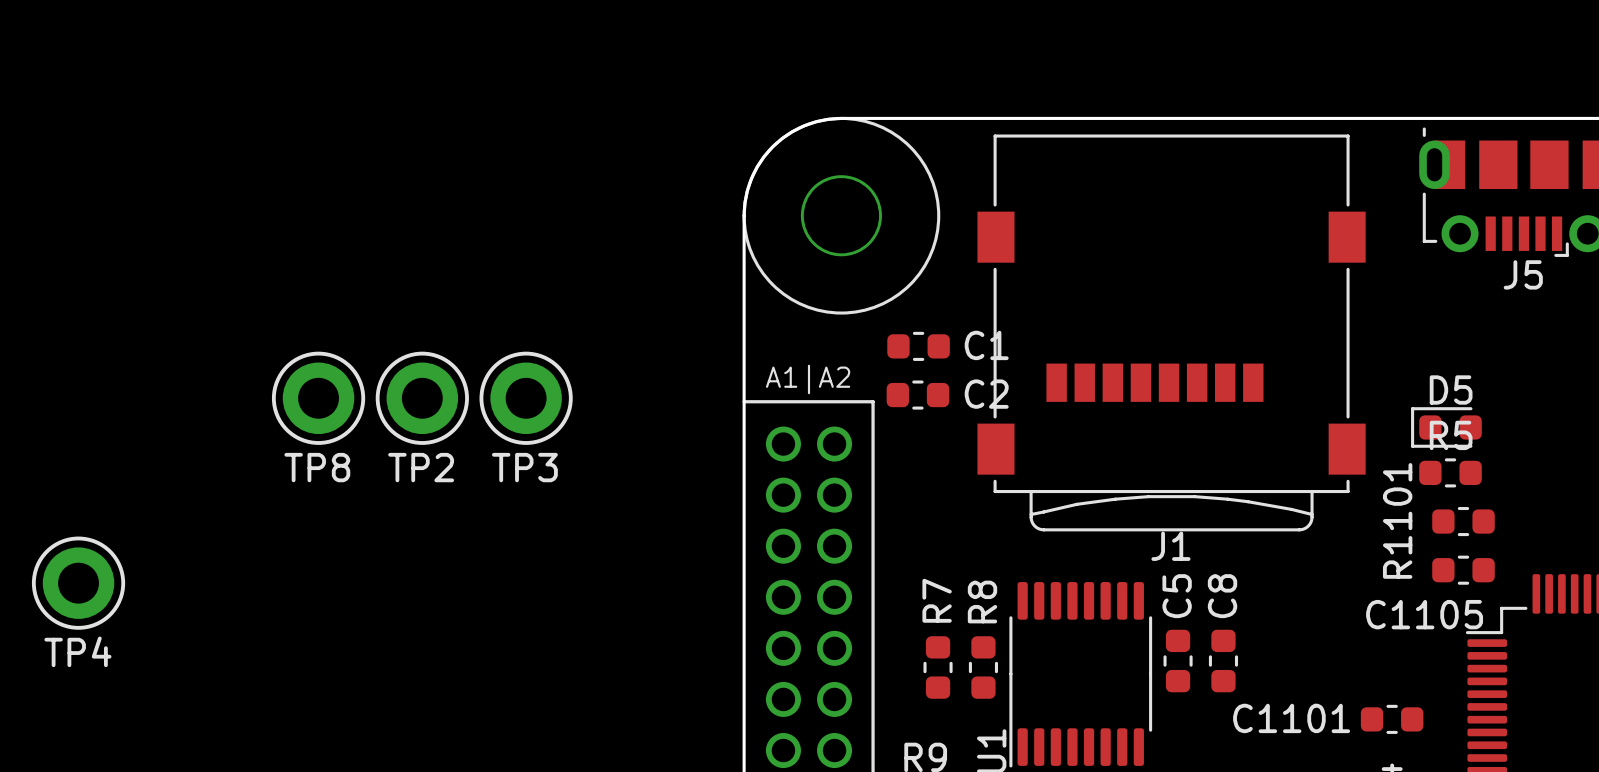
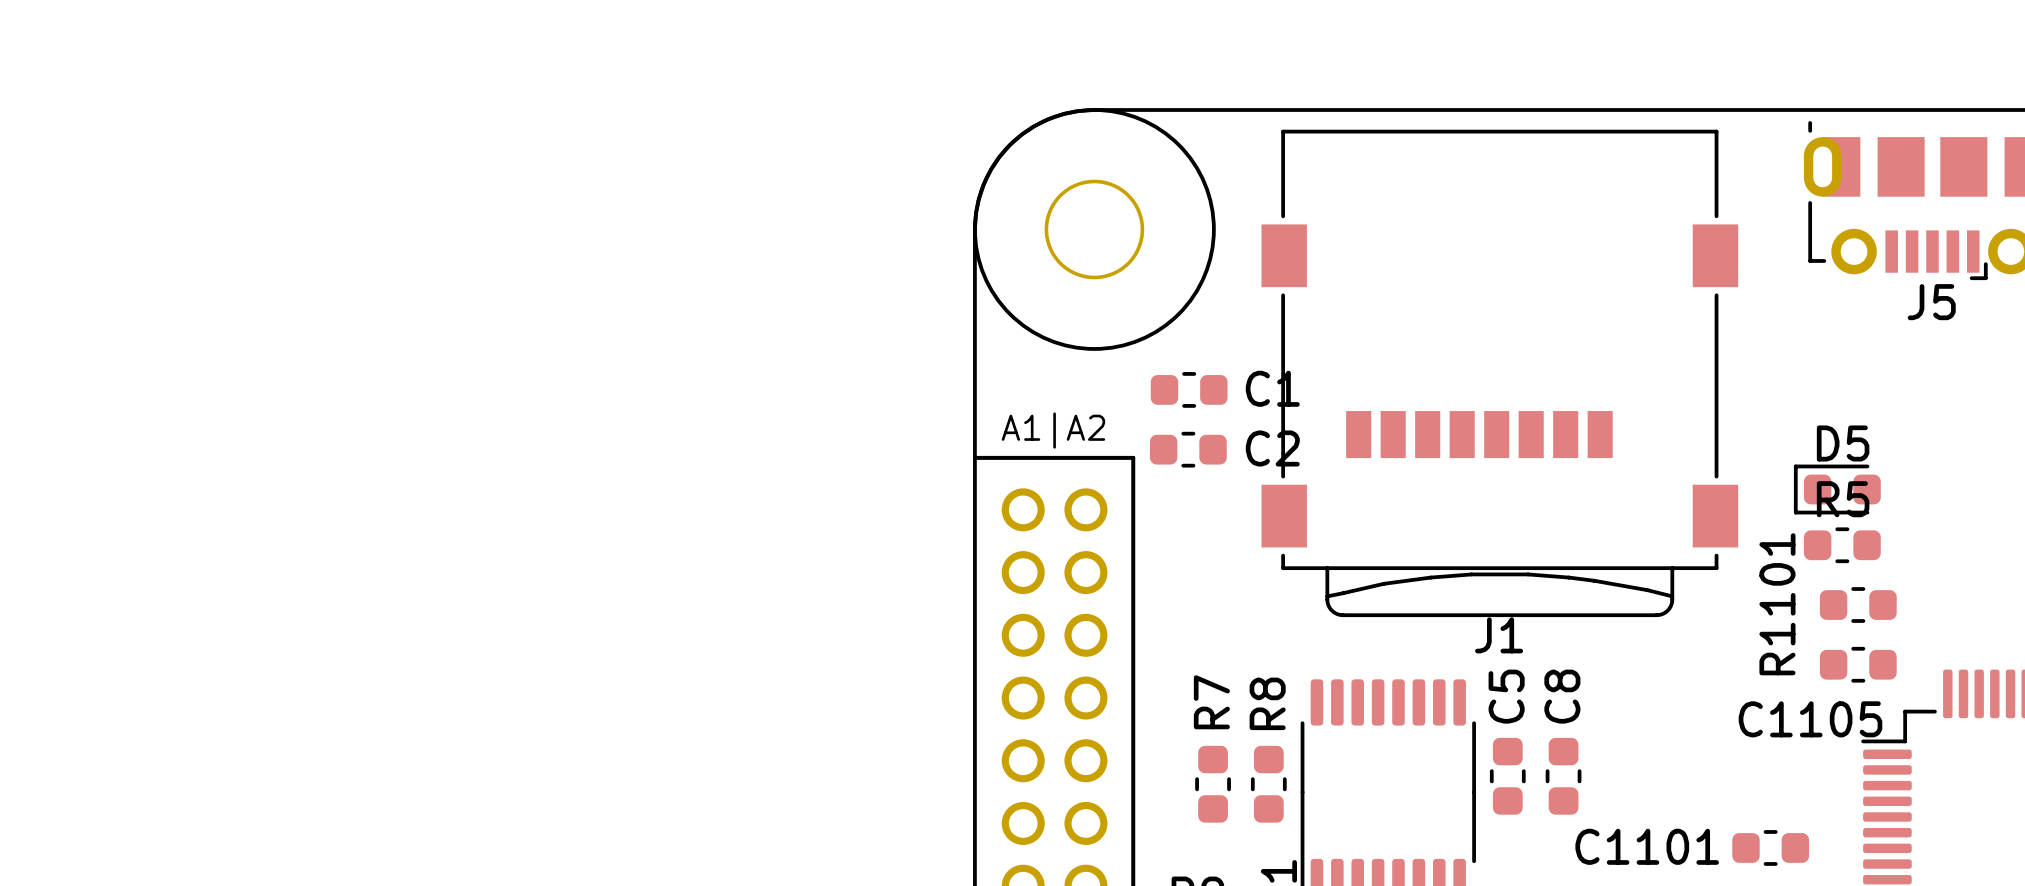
TP8: (318, 398) -> none
TP2: (422, 398) -> none
TP3: (526, 398) -> none
TP4: (78, 583) -> none

